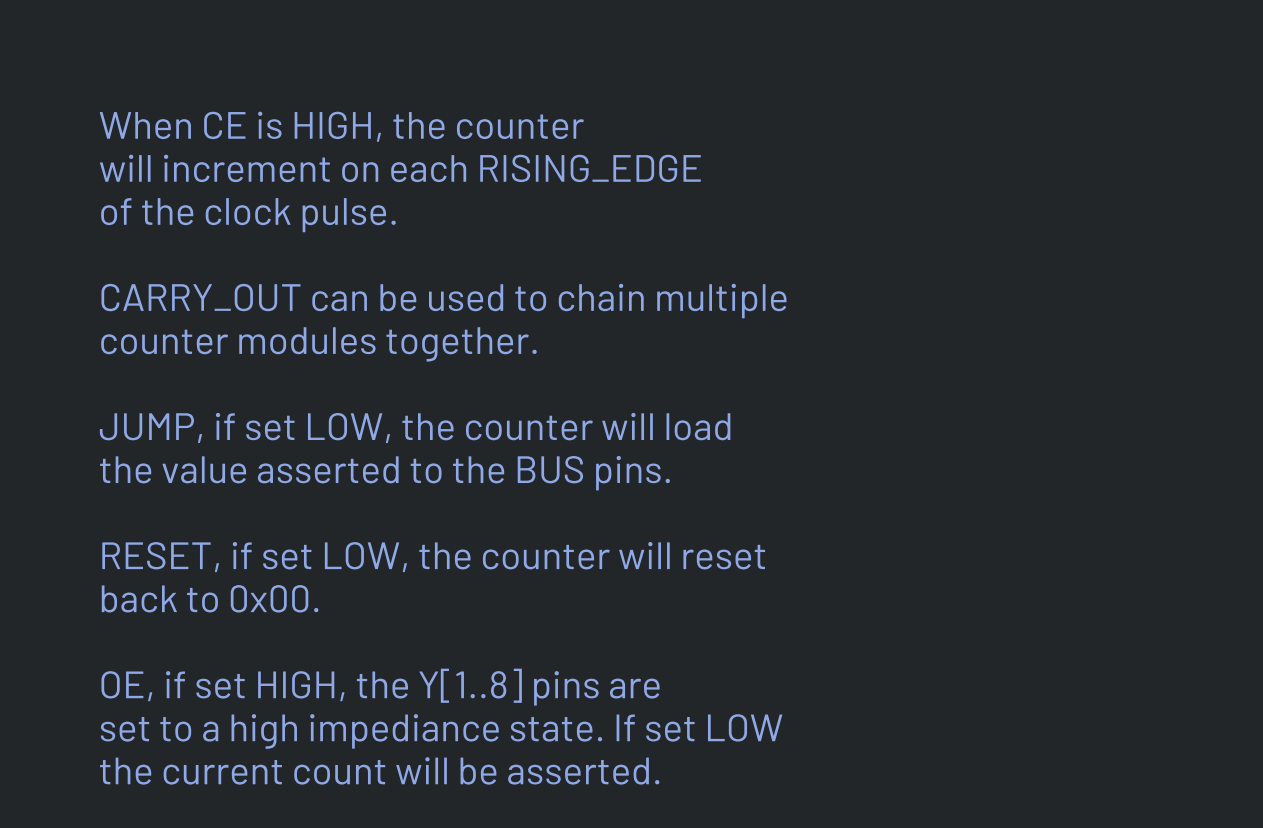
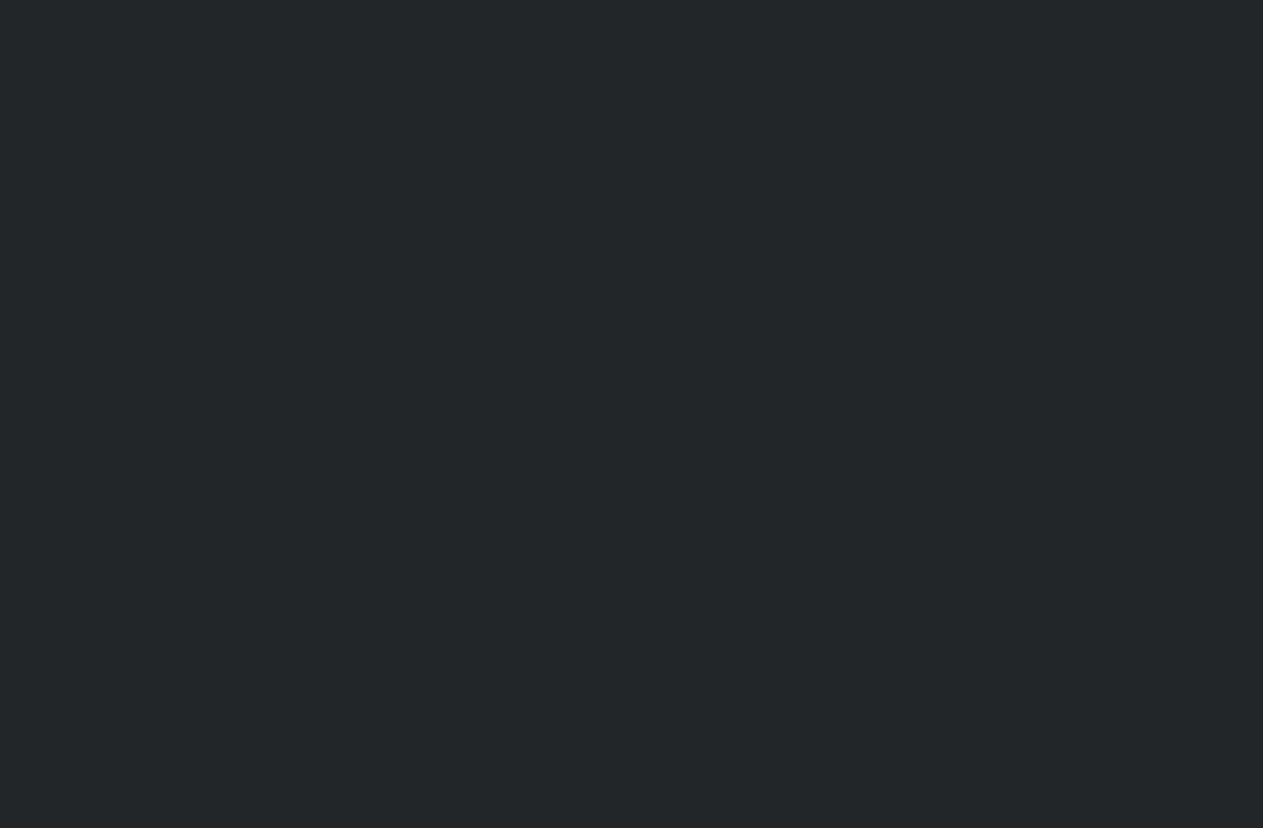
text: When CE is HIGH, the counter (341, 126) -> none
text: will increment on each RISING_EDGE (400, 168) -> none
text: of the clock pulse. (248, 215) -> none
text: CARRY_OUT can be used to chain multiple (444, 301) -> none
text: counter modules together. (318, 344) -> none
text: JUMP, if set LOW, the counter will load (415, 427) -> none
text: the value asserted to the BUS pins. (385, 473) -> none
text: RESET, if set LOW, the counter will reset (433, 557) -> none
text: back to 0x00. (210, 598) -> none
text: OE, if set HIGH, the Y[1..8] pins are (380, 687) -> none
text: set to a high impediance state. If set LOW (441, 731) -> none
text: the current count will be asserted. (379, 770) -> none

